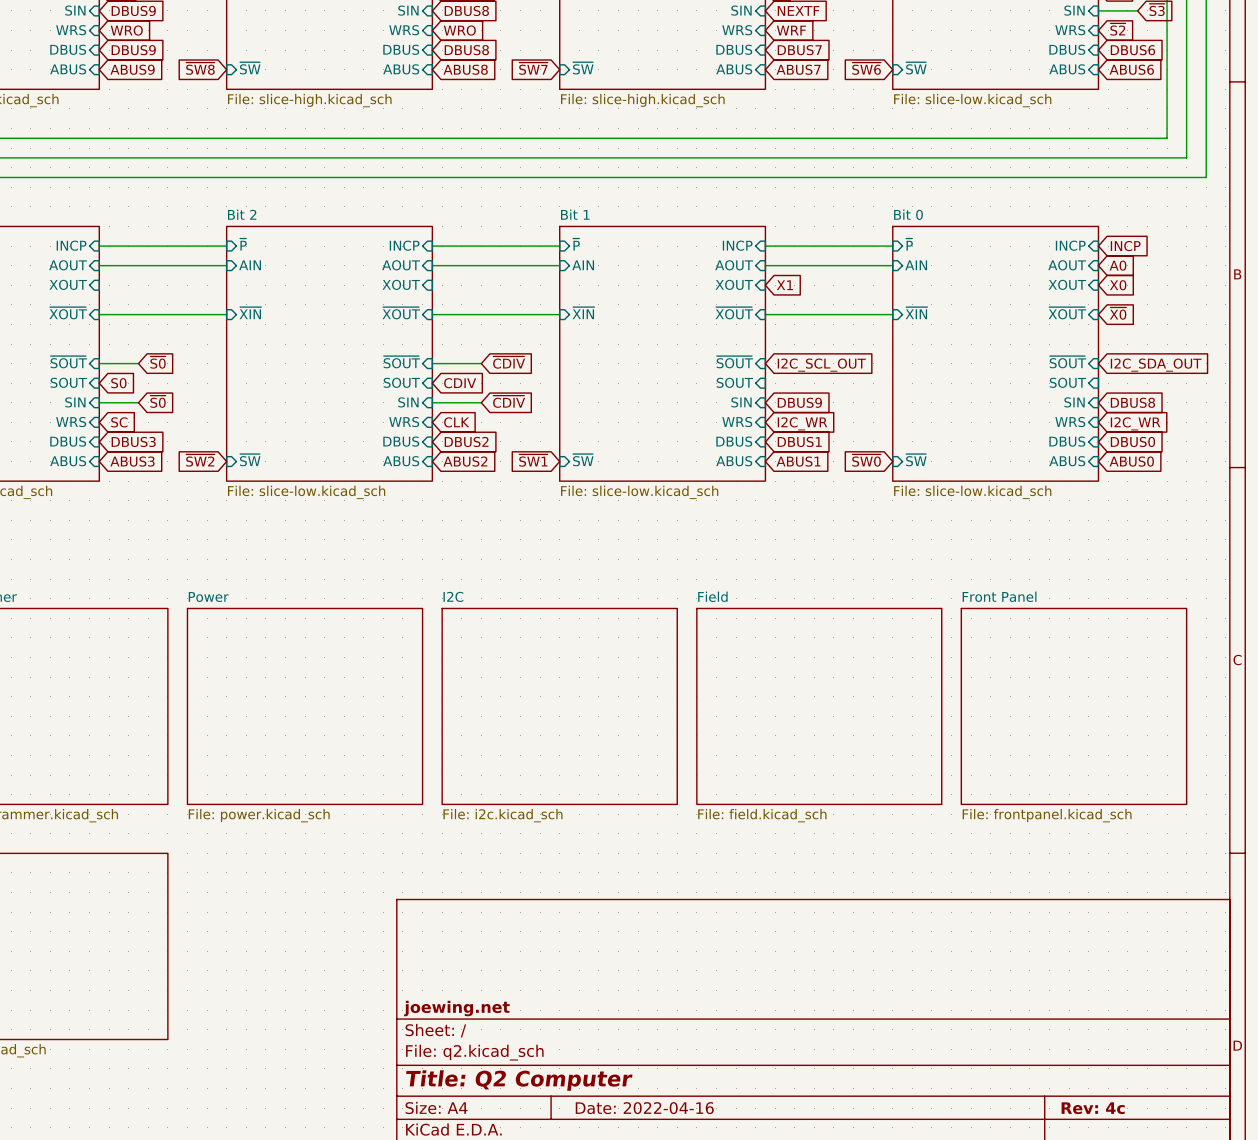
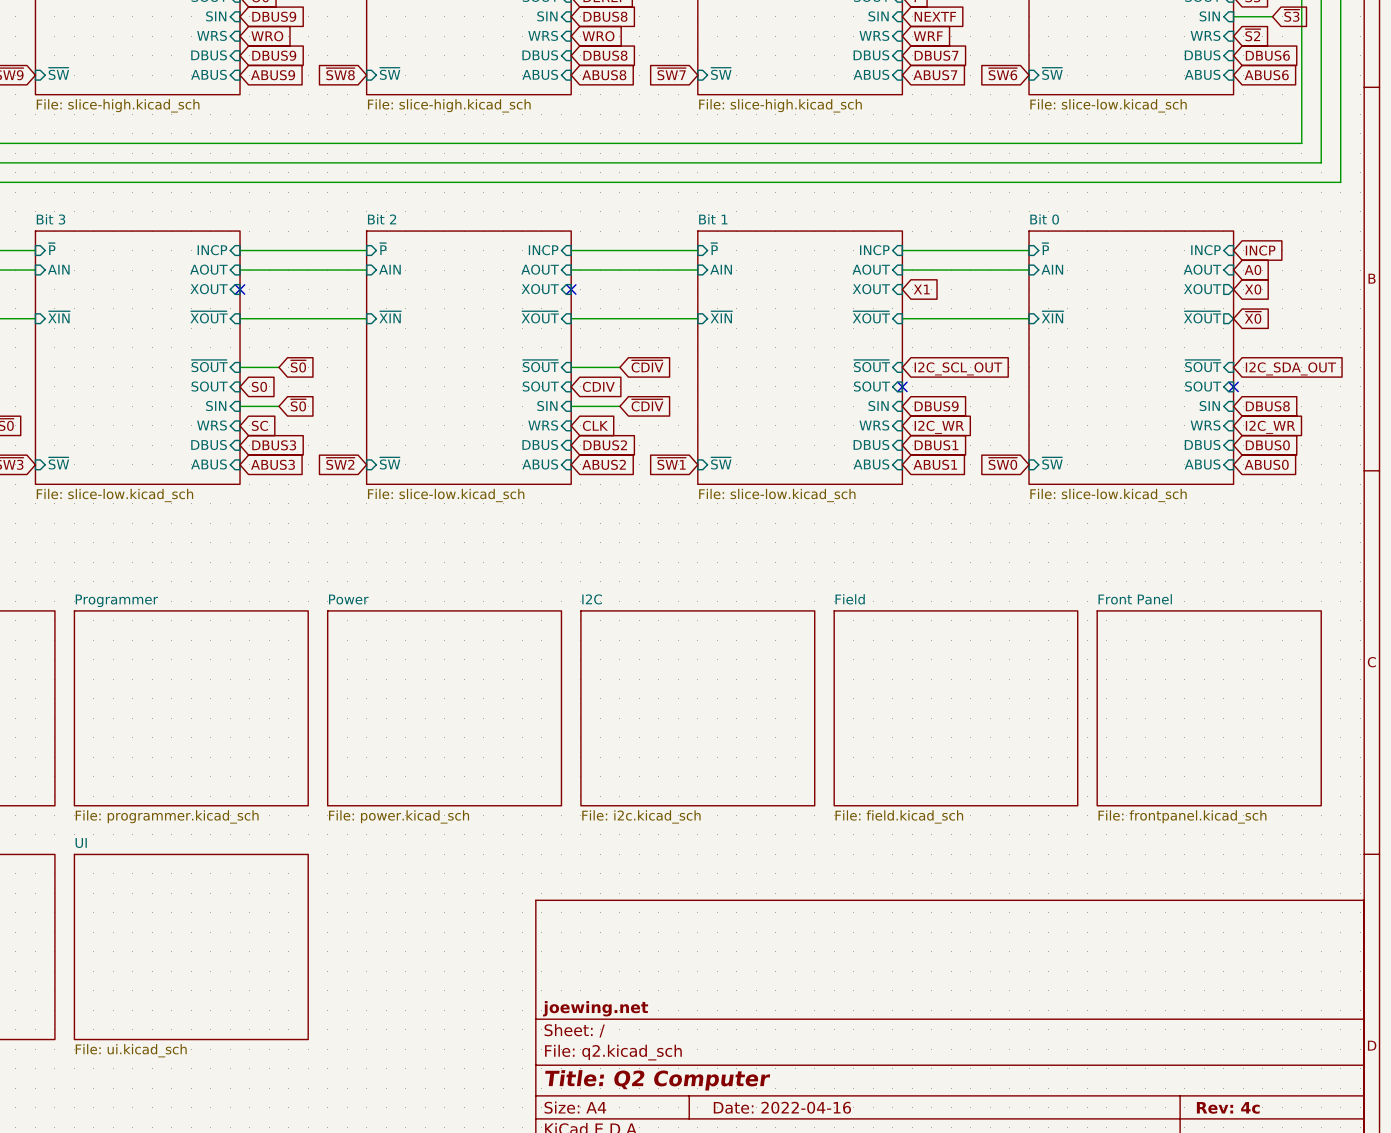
sheet pin shape: input (1067, 284) -> output (1202, 289)
no-connect mark: none -> (240, 289)
no-connect mark: none -> (571, 289)
sheet pin shape: input (1067, 313) -> output (1202, 317)
no-connect mark: none -> (902, 386)
no-connect mark: none -> (1233, 386)

